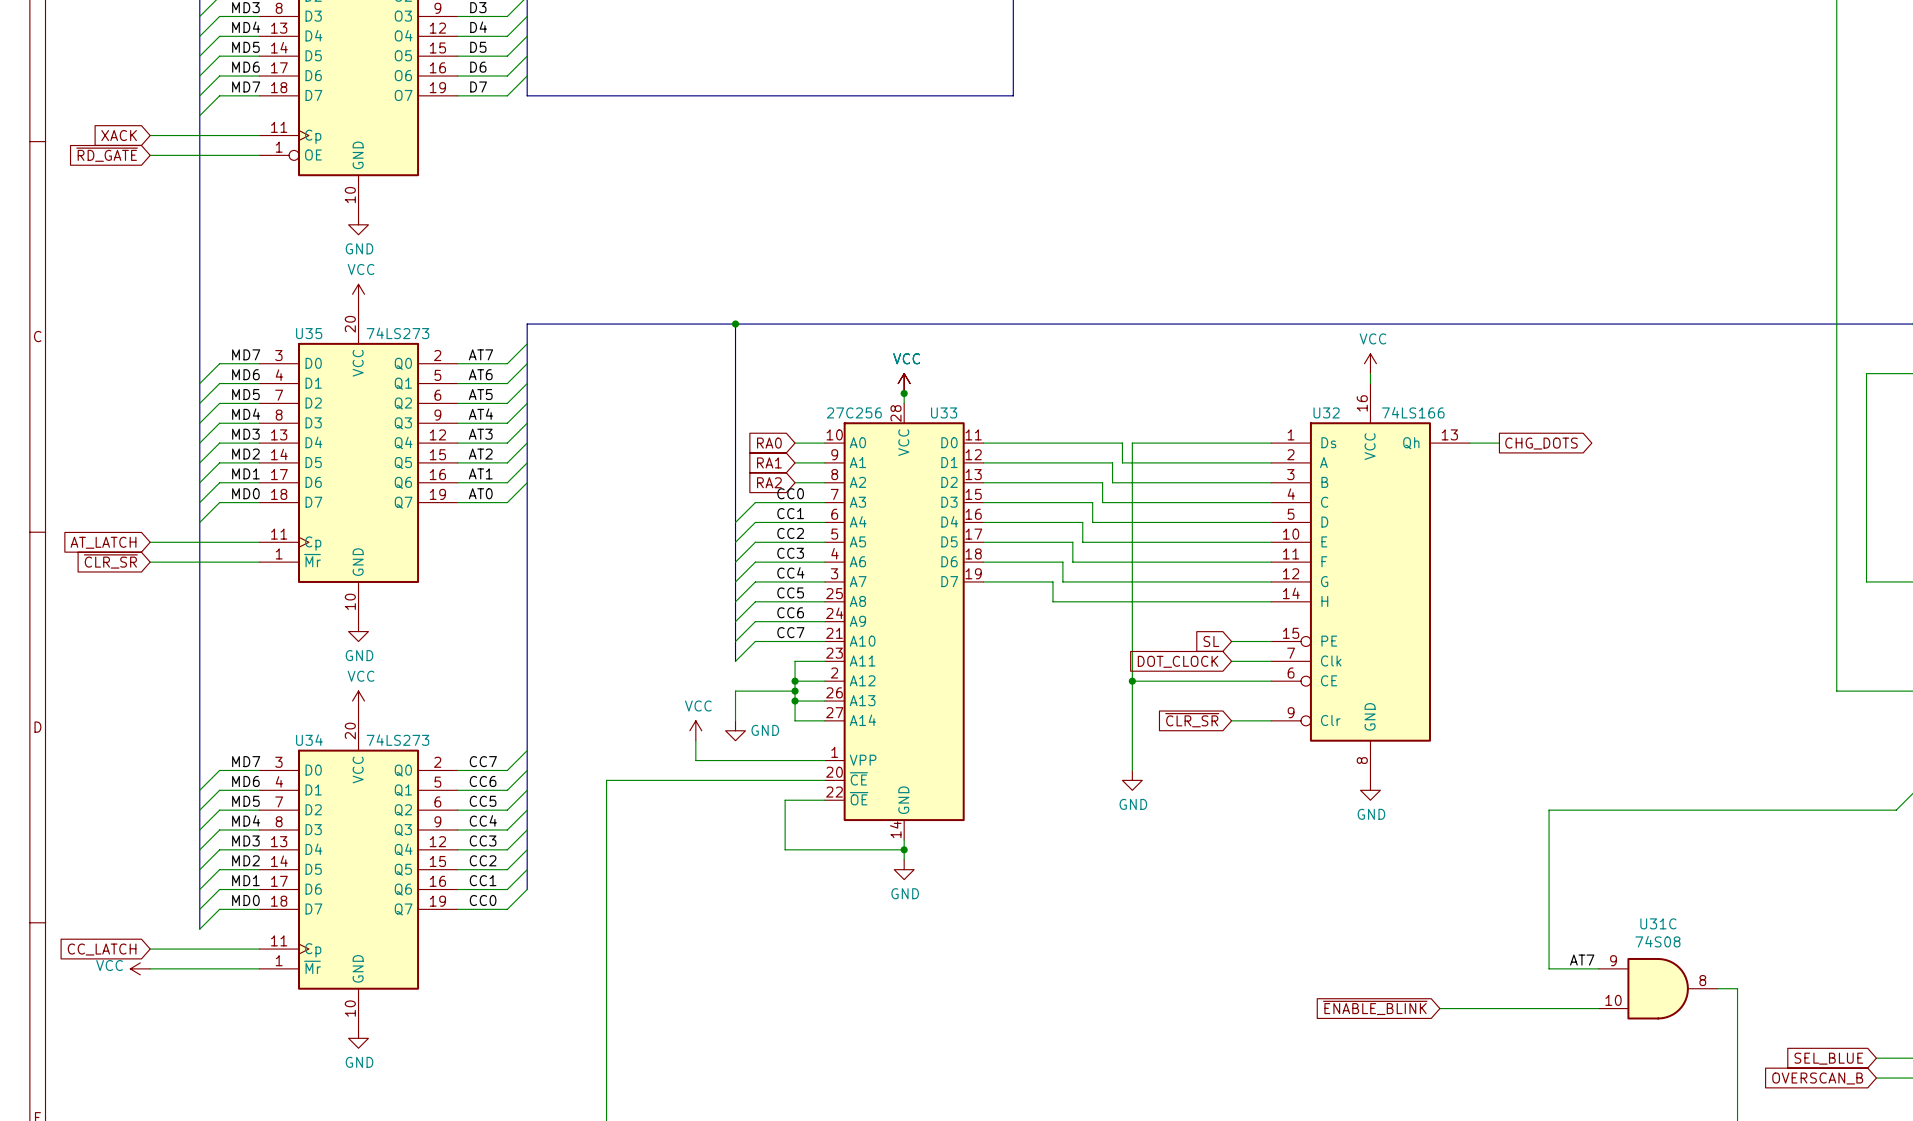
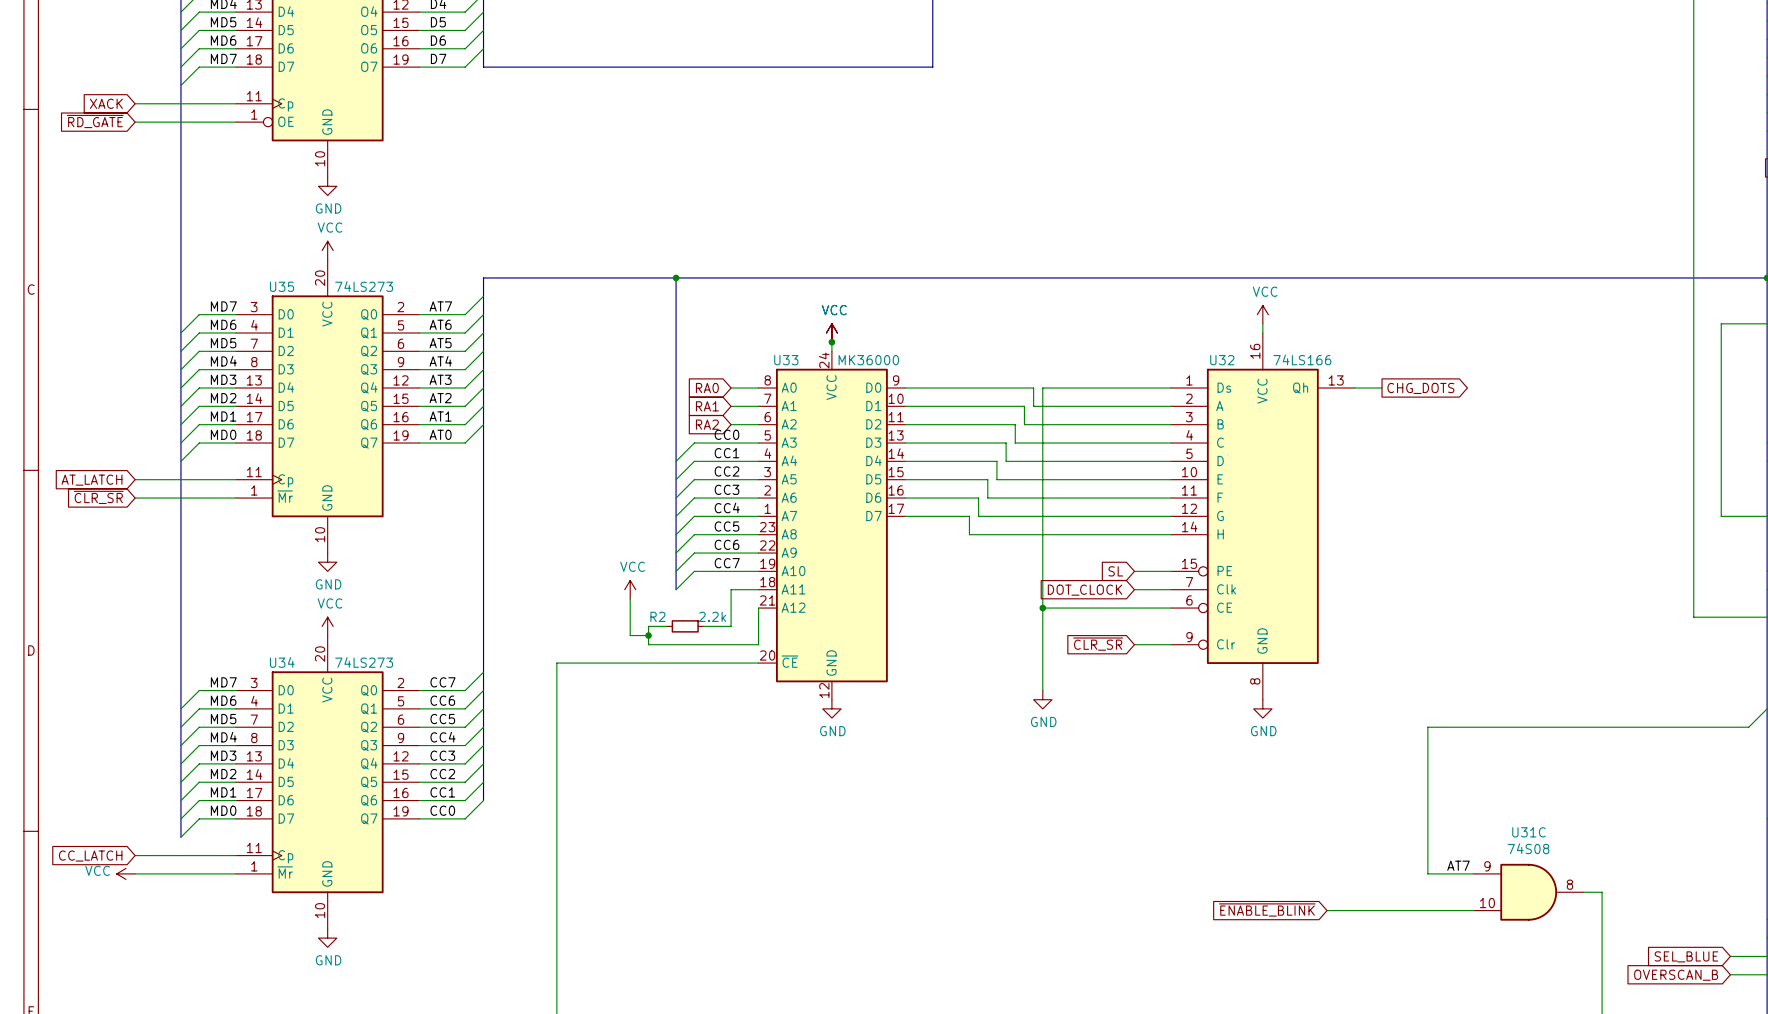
U33 symbol: [824, 403, 984, 840] -> [758, 351, 906, 700]
U33 value: 27C256 (854, 412) -> MK36000 (868, 360)
U33 name position: U33 (944, 412) -> U33 (786, 360)
wire: none -> (630, 598) (630, 635) (648, 635)
wire: (795, 681) (824, 681) -> (758, 644) (758, 608)
junction: (795, 681) -> none
wire: (795, 691) (735, 691) (735, 720) -> none
junction: (795, 691) -> none
R2: none -> 2.2k (685, 626)
wire: none -> (703, 626) (731, 626)
junction: (795, 701) -> none
wire: (824, 701) (795, 701) (795, 720) -> (666, 626) (648, 626) (648, 644) (731, 644)
junction: none -> (648, 635)
power symbol position: VCC (695, 730) -> VCC (630, 589)
power symbol: GND (735, 730) -> none
wire: (695, 740) (695, 760) (824, 760) -> none
wire: (606, 780) (824, 780) -> (556, 699) (556, 663) (758, 663)
wire: (824, 800) (785, 800) (785, 849) (904, 849) -> none
wire: (904, 839) (904, 859) -> none
junction: (904, 849) -> none
power symbol position: GND (904, 869) -> GND (831, 708)

